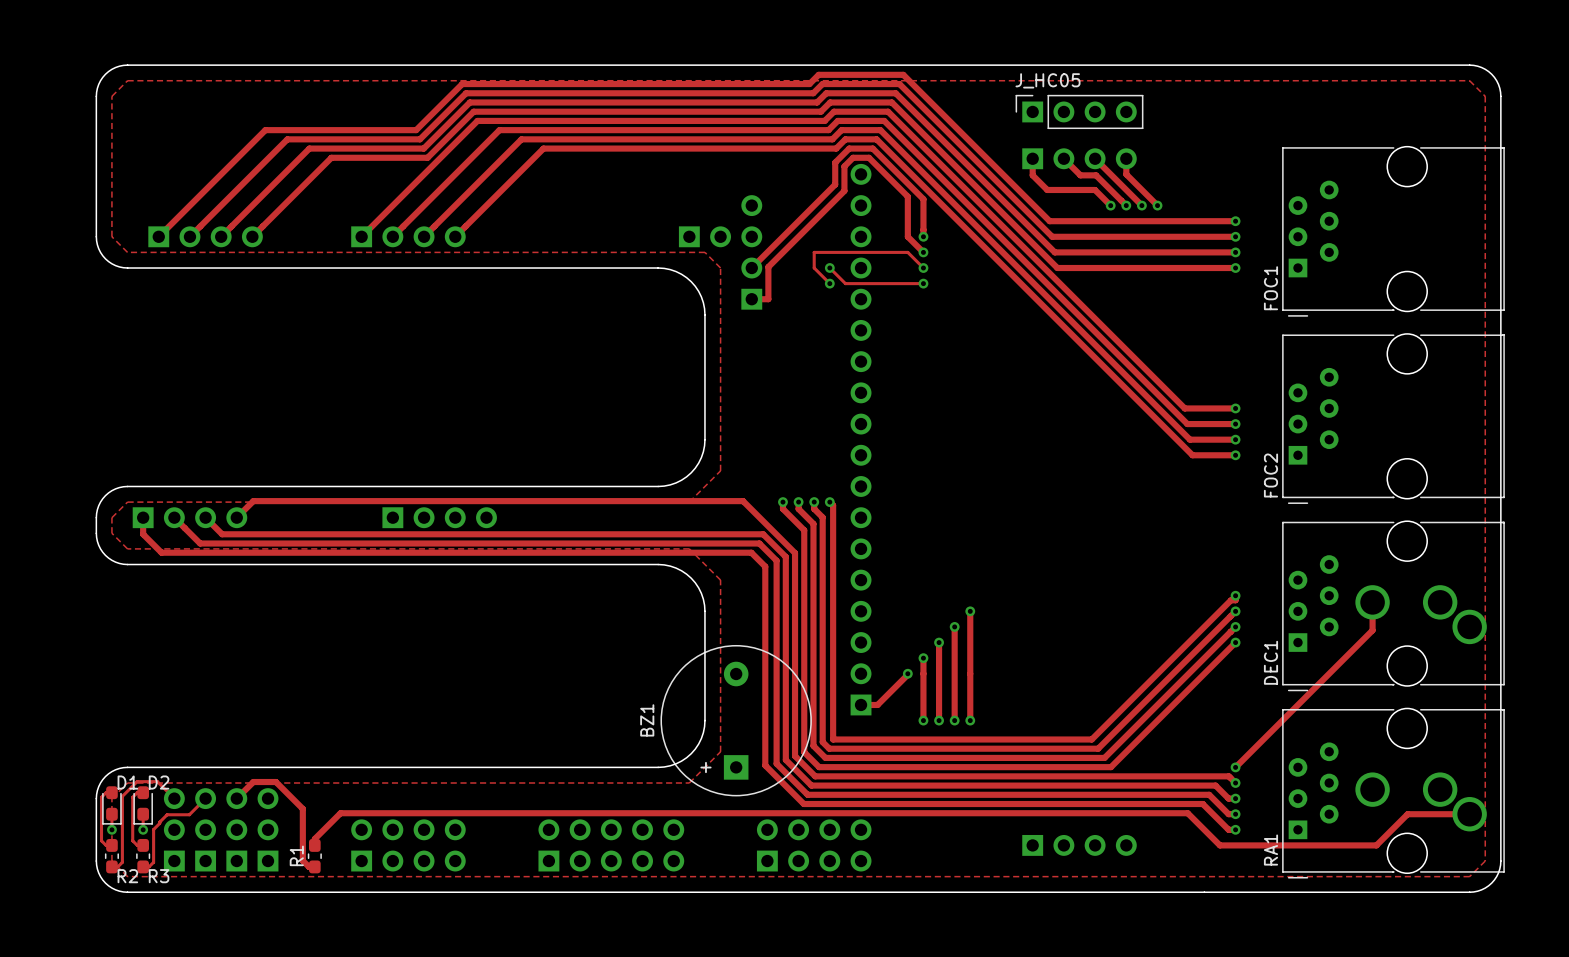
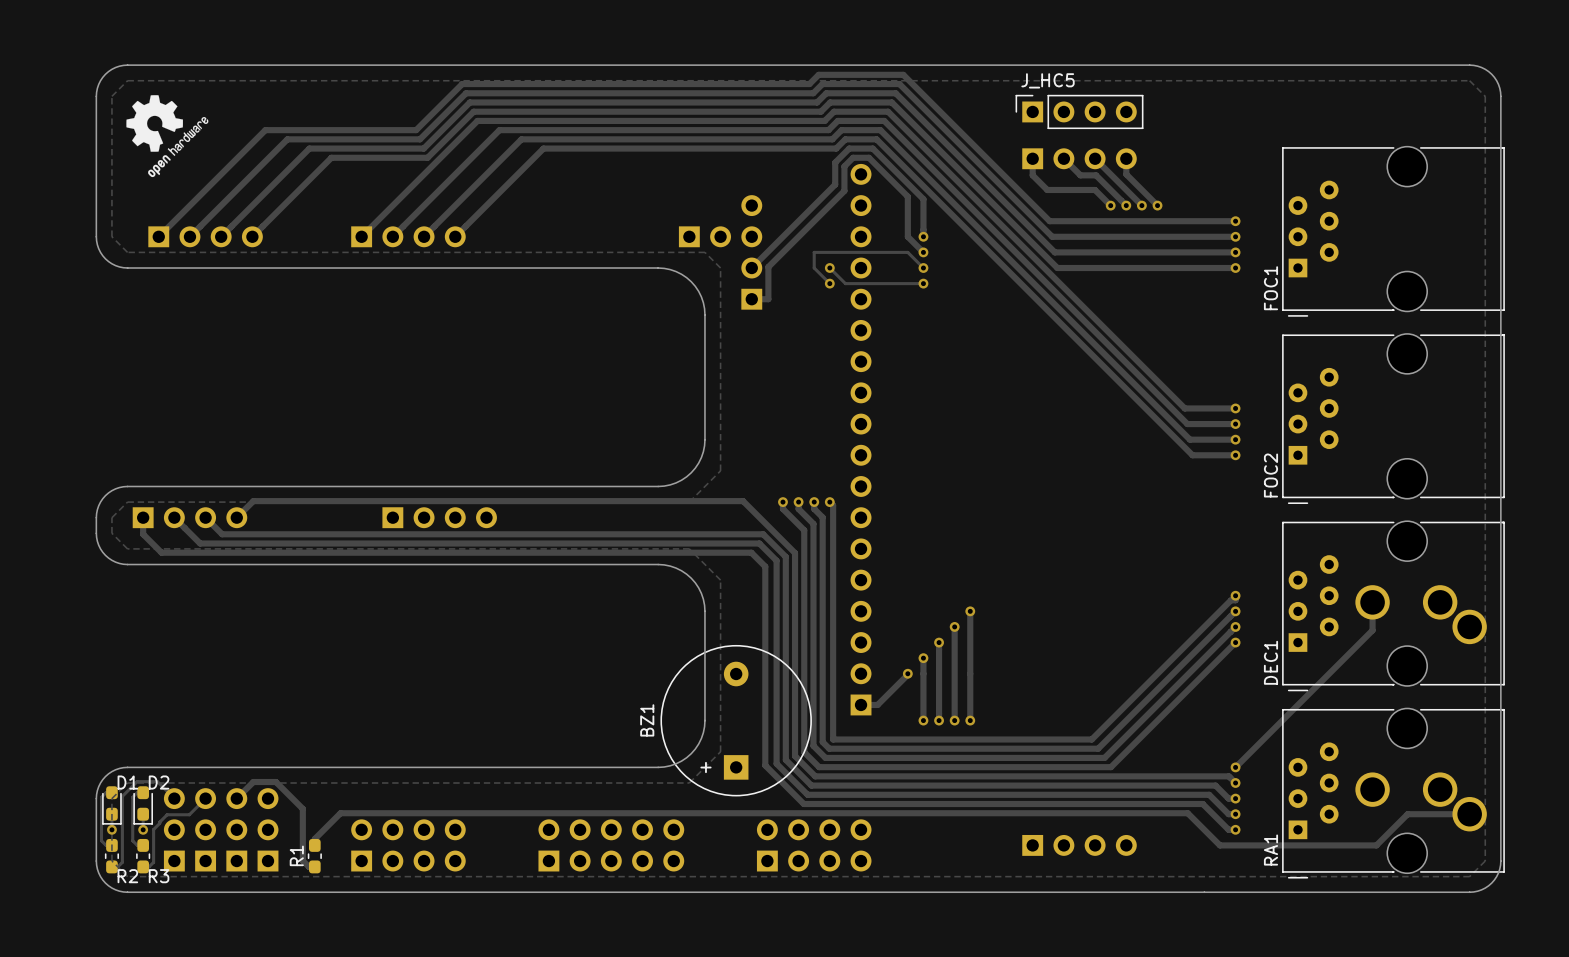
J_HC05 name: J_HC05 (1048, 80) -> J_HC5 (1048, 80)
drawing: none -> [126, 95, 209, 178]

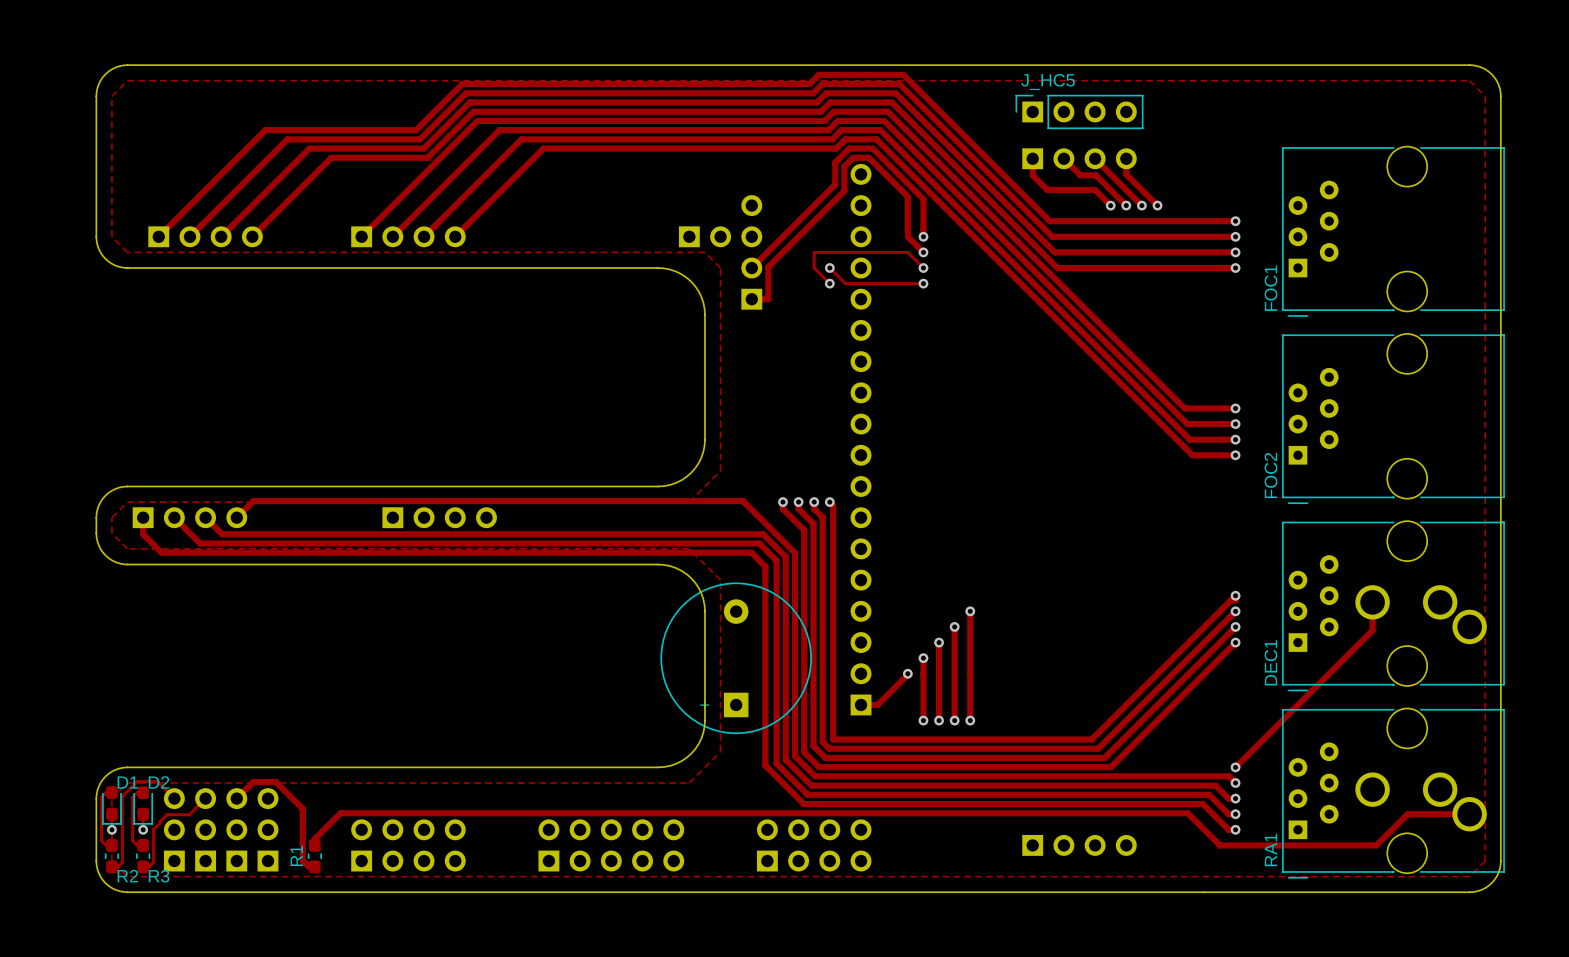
drawing: [126, 95, 209, 178] -> none
part: none -> (736, 658)
BZ1: (736, 720) -> none

